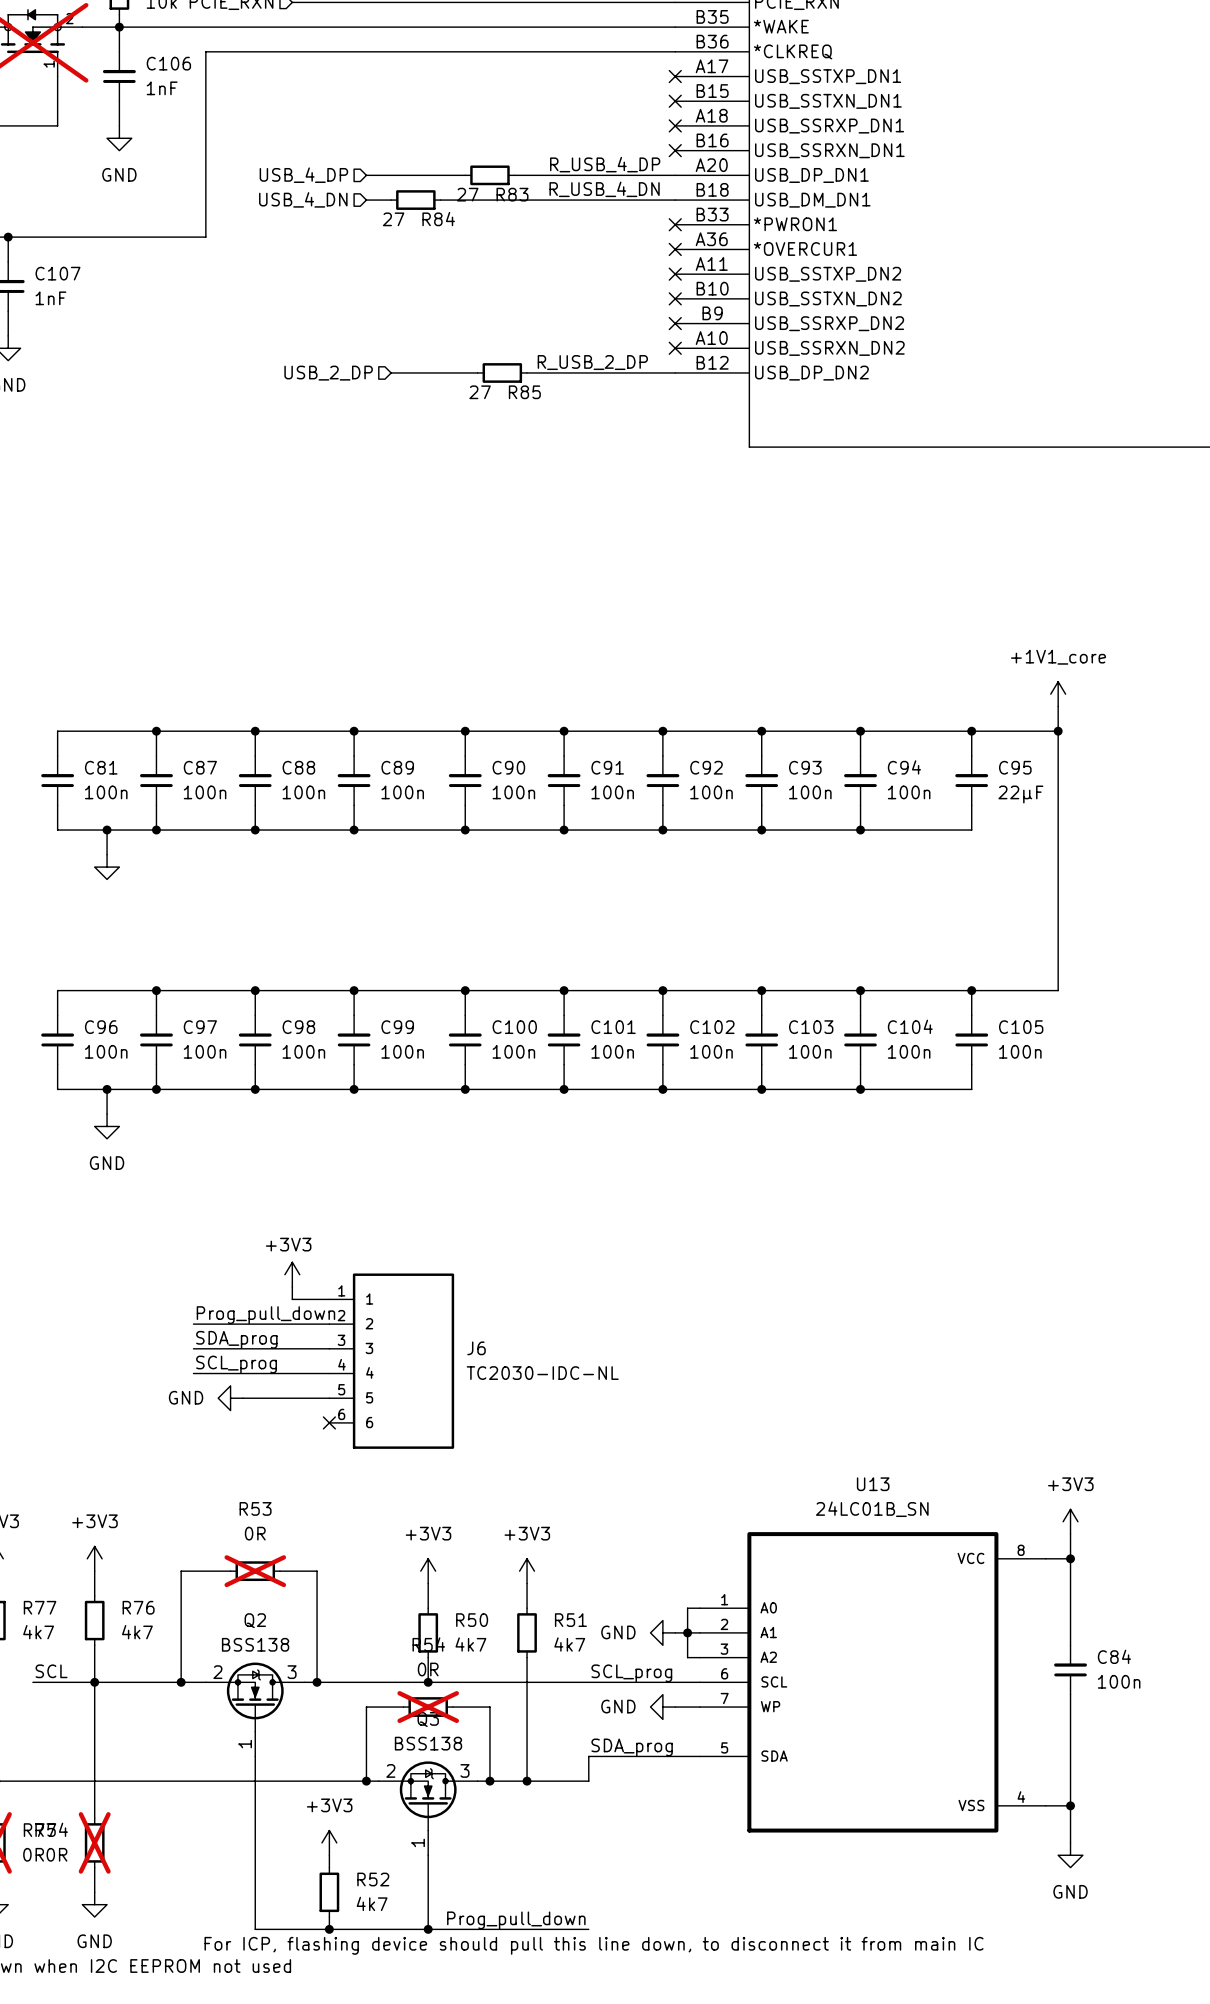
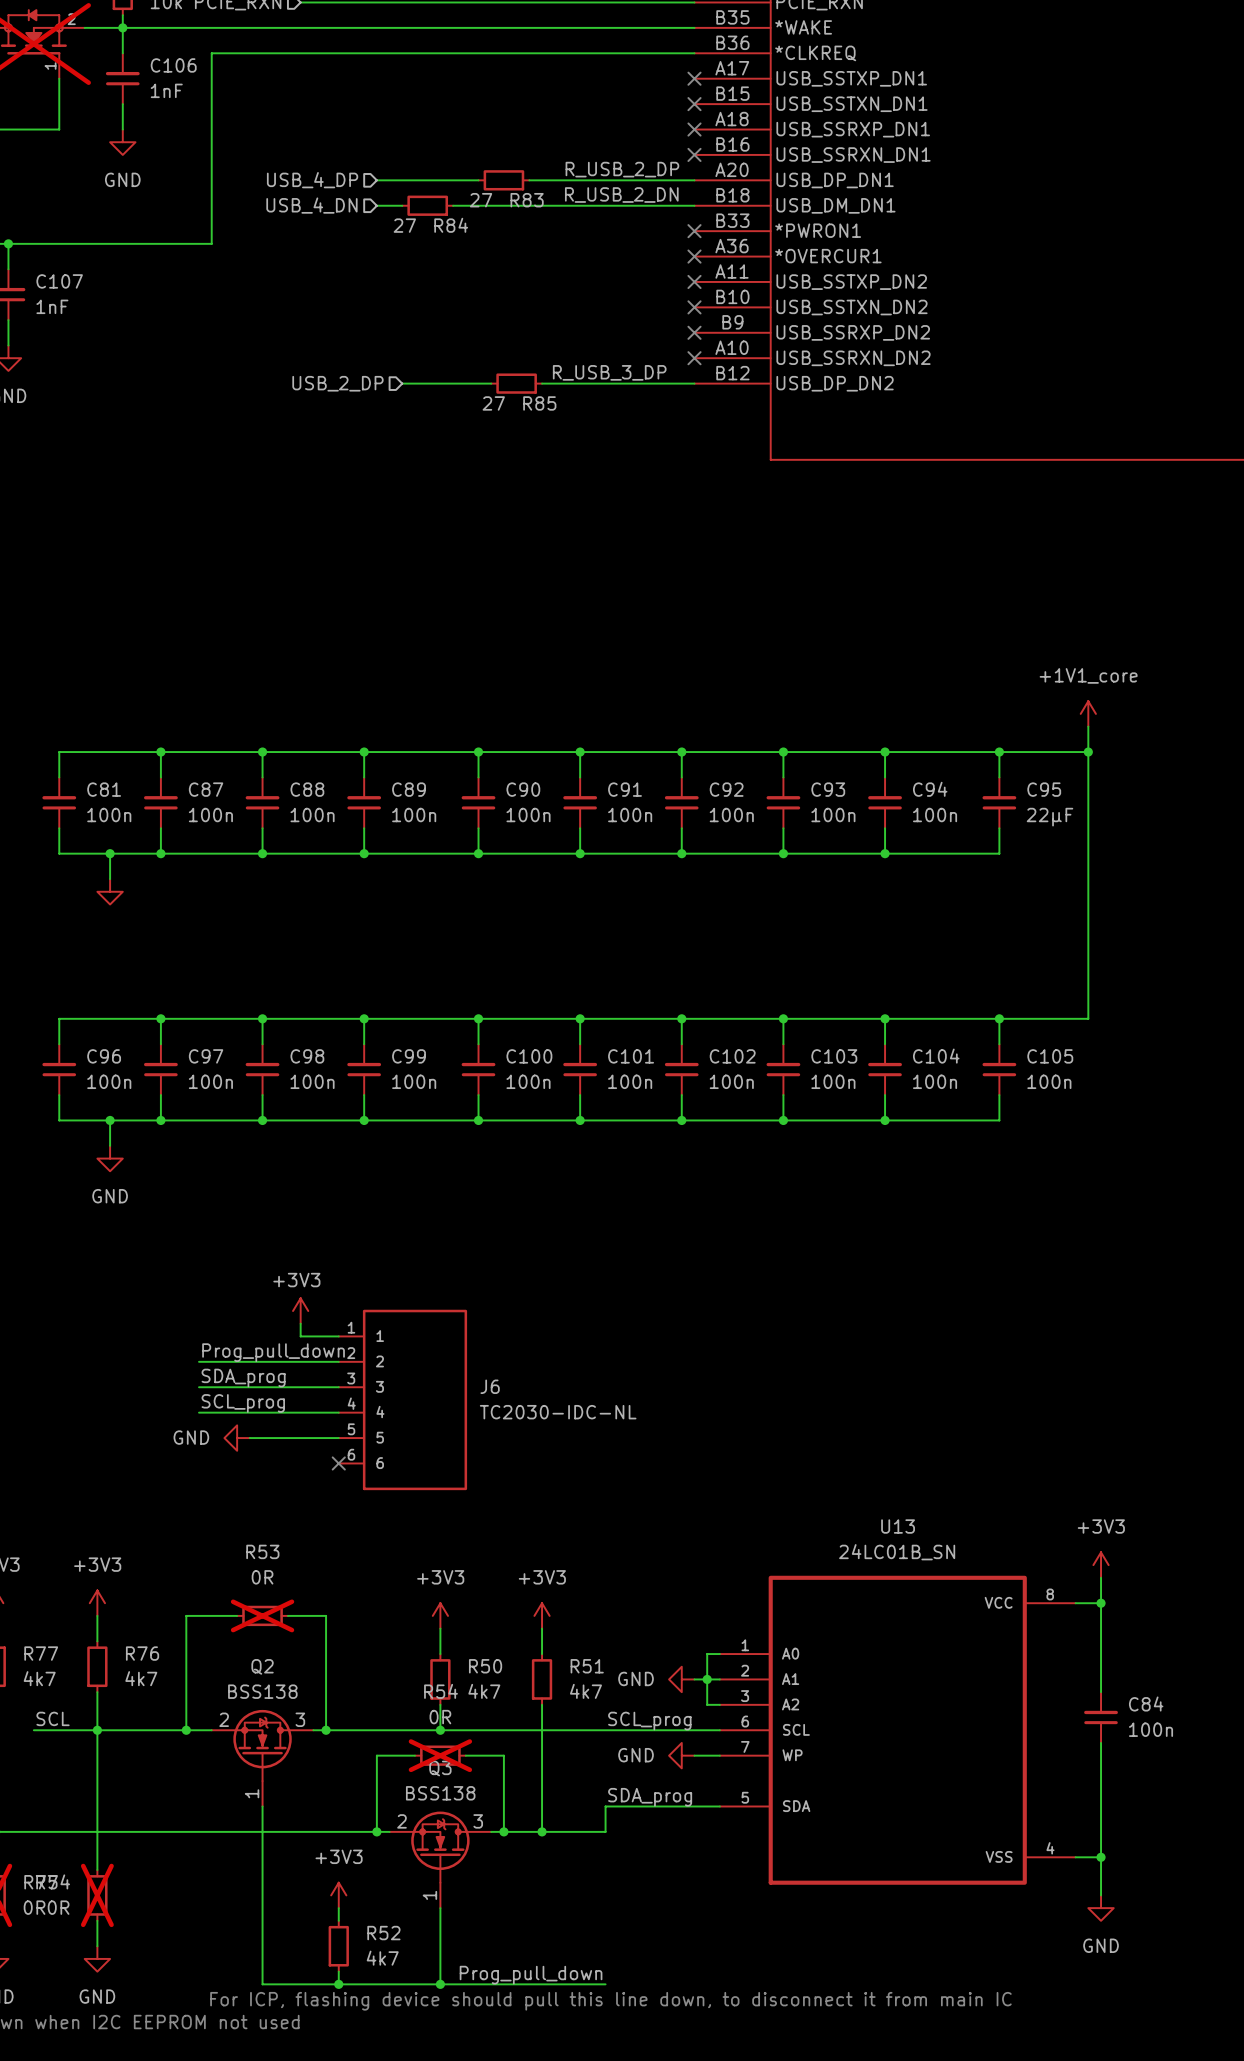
label: R_USB_4_DP (605, 164) -> R_USB_2_DP (622, 169)
label: R_USB_4_DN (604, 189) -> R_USB_2_DN (621, 195)
label: R_USB_2_DP (592, 362) -> R_USB_3_DP (609, 372)

